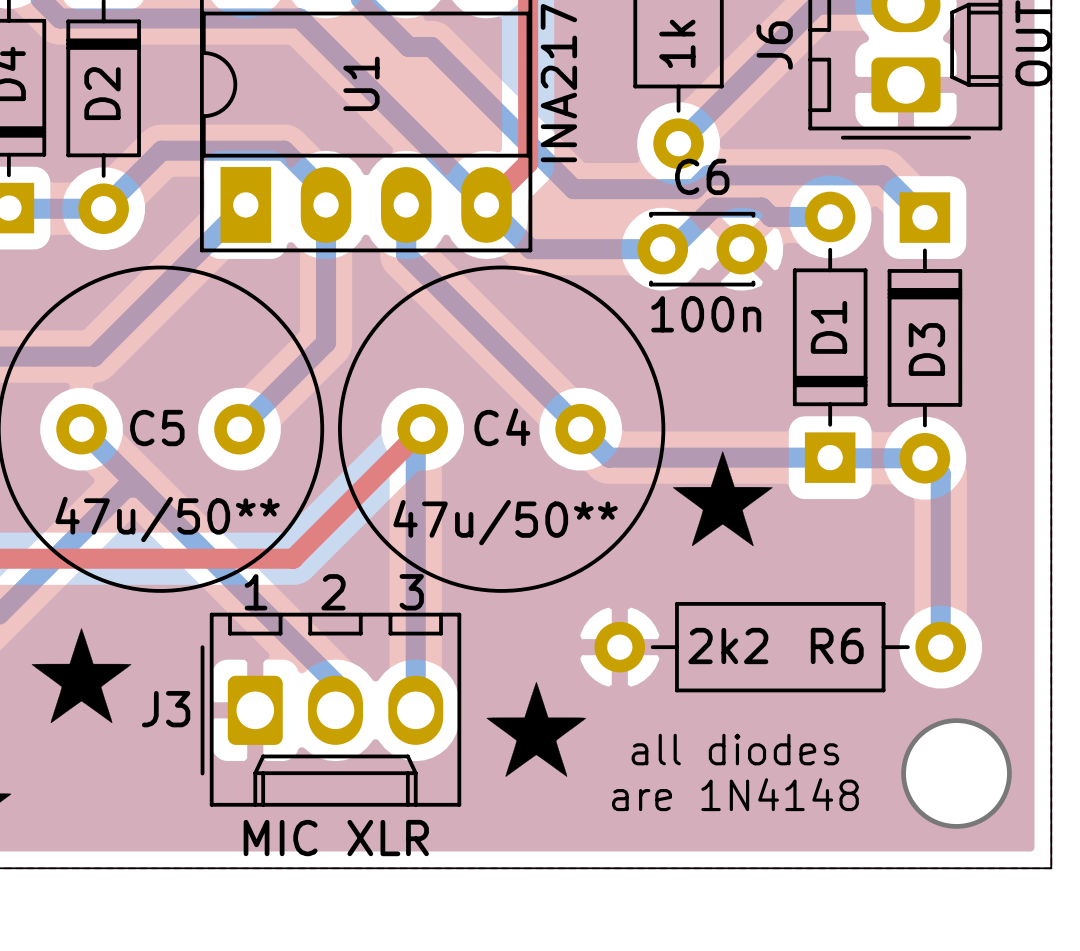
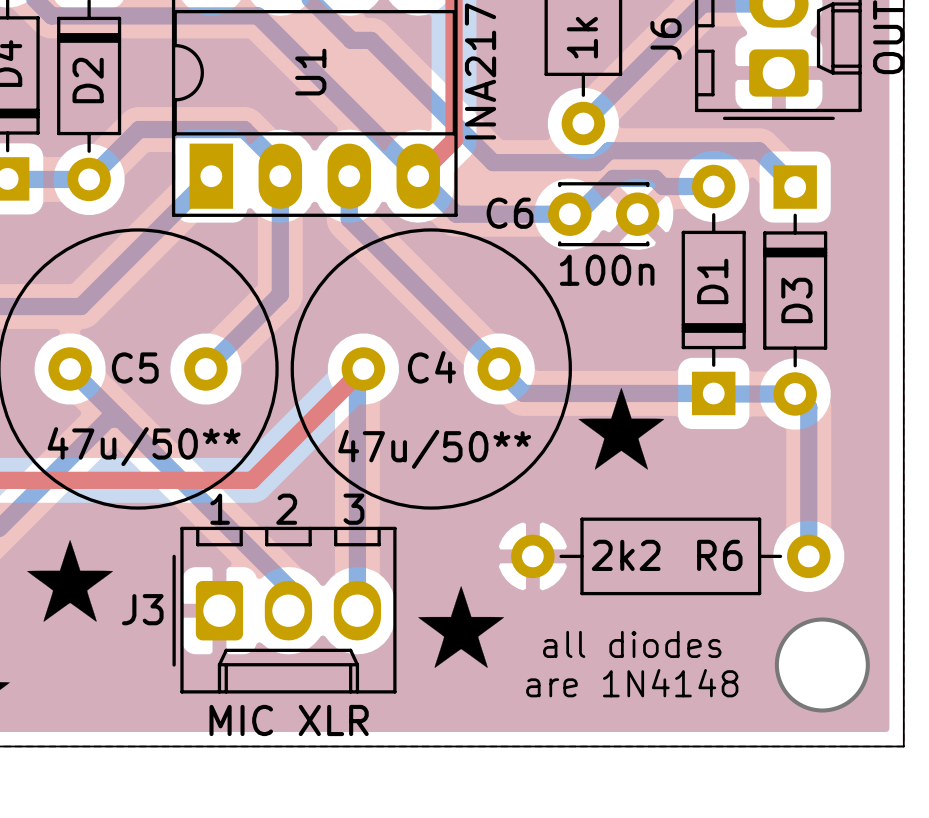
C6 name position: C6 (702, 176) -> C6 (510, 213)

